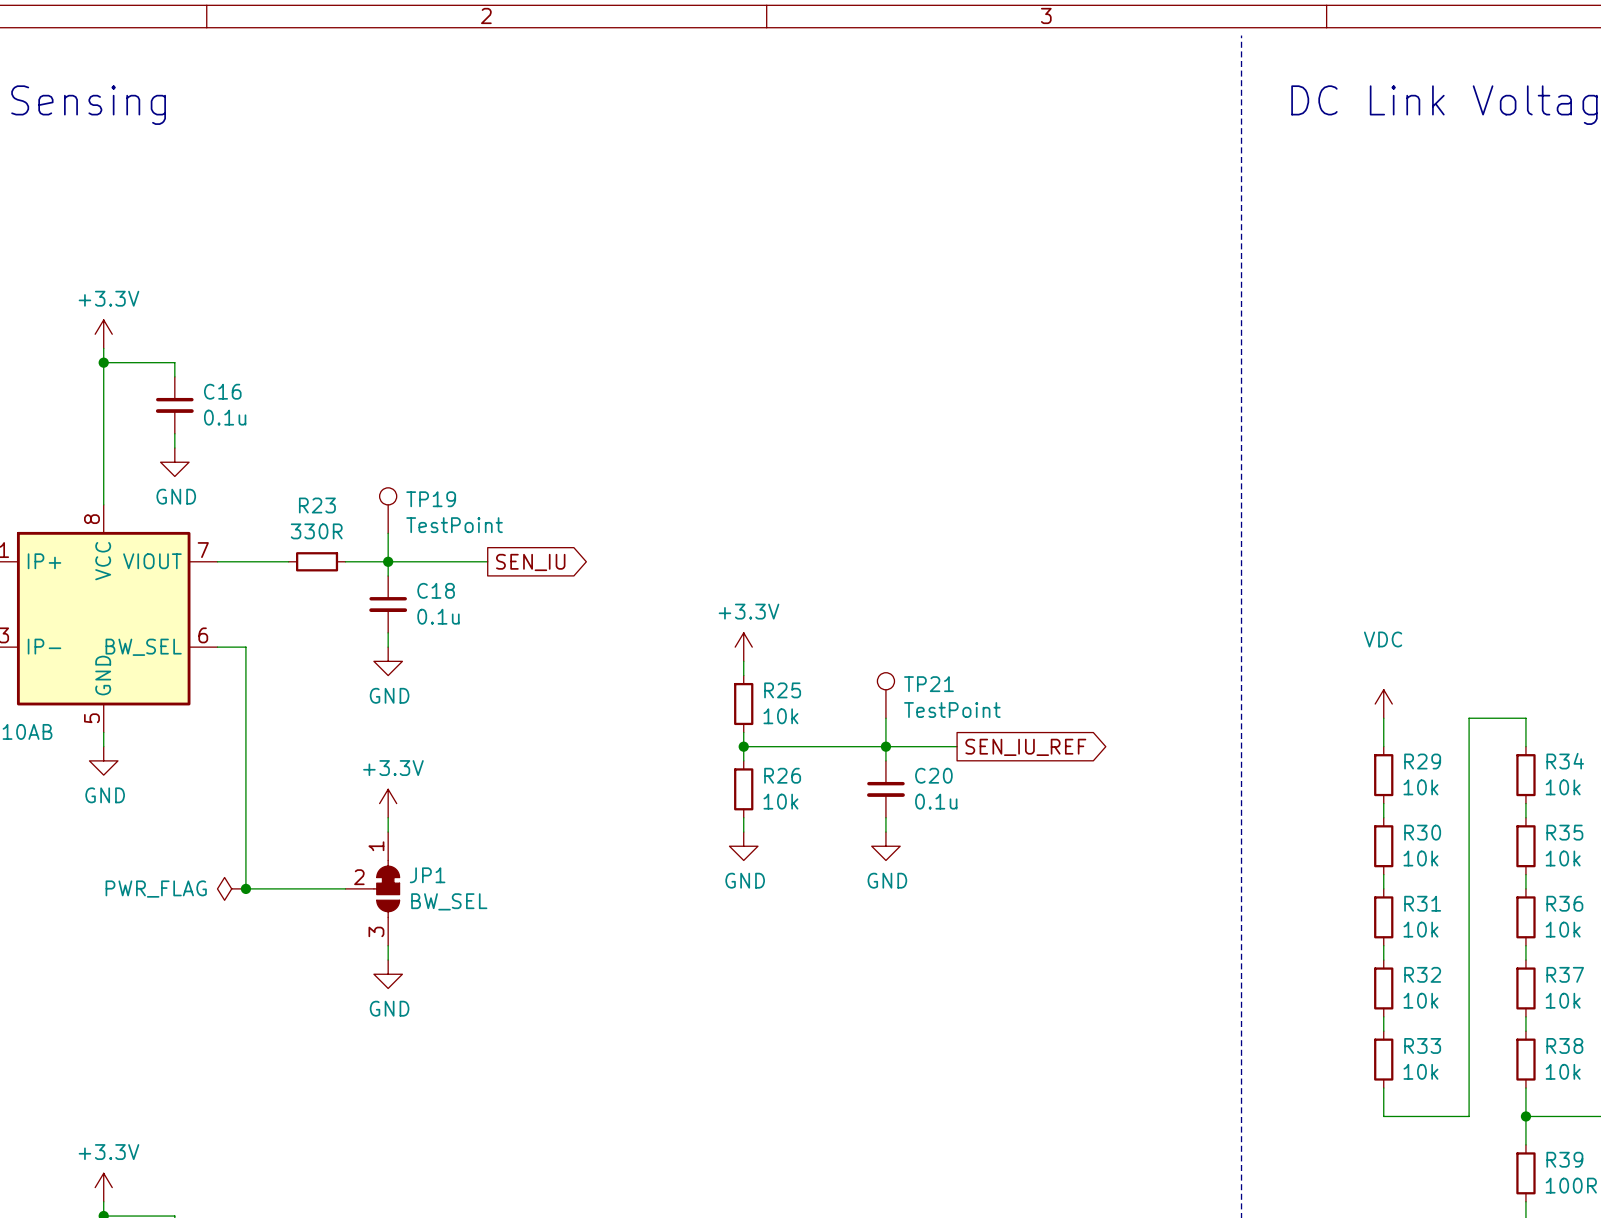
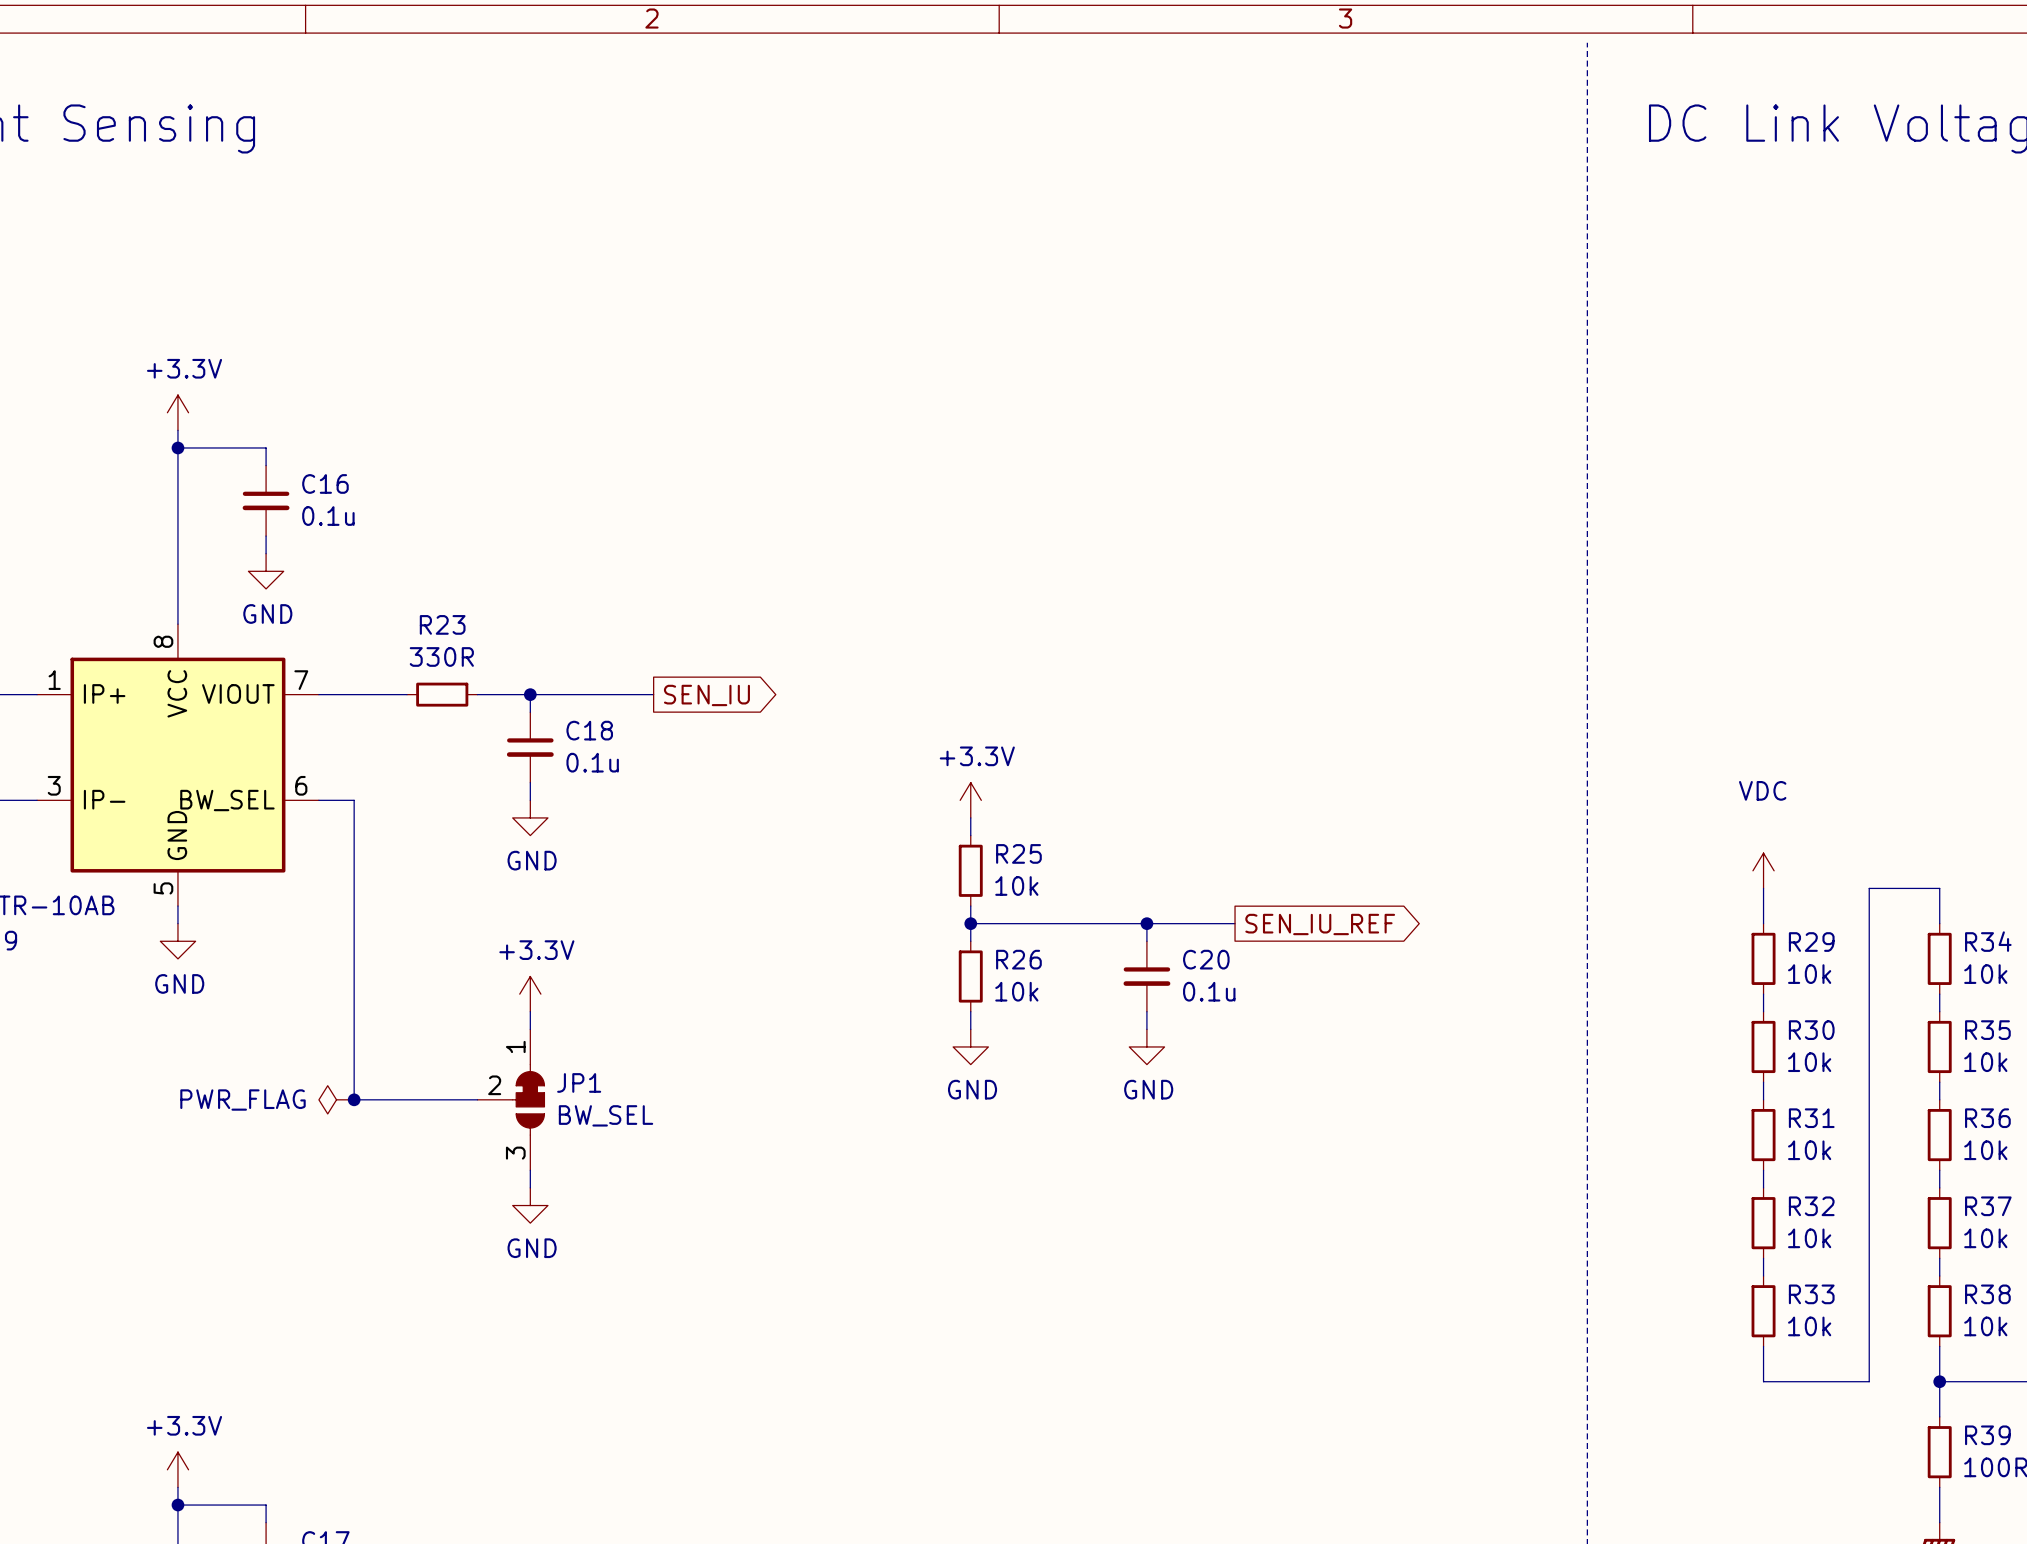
TP19: TestPoint (388, 510) -> none
wire: (388, 533) (388, 561) -> none
TP21: TestPoint (885, 695) -> none
wire: (885, 718) (885, 746) -> none

